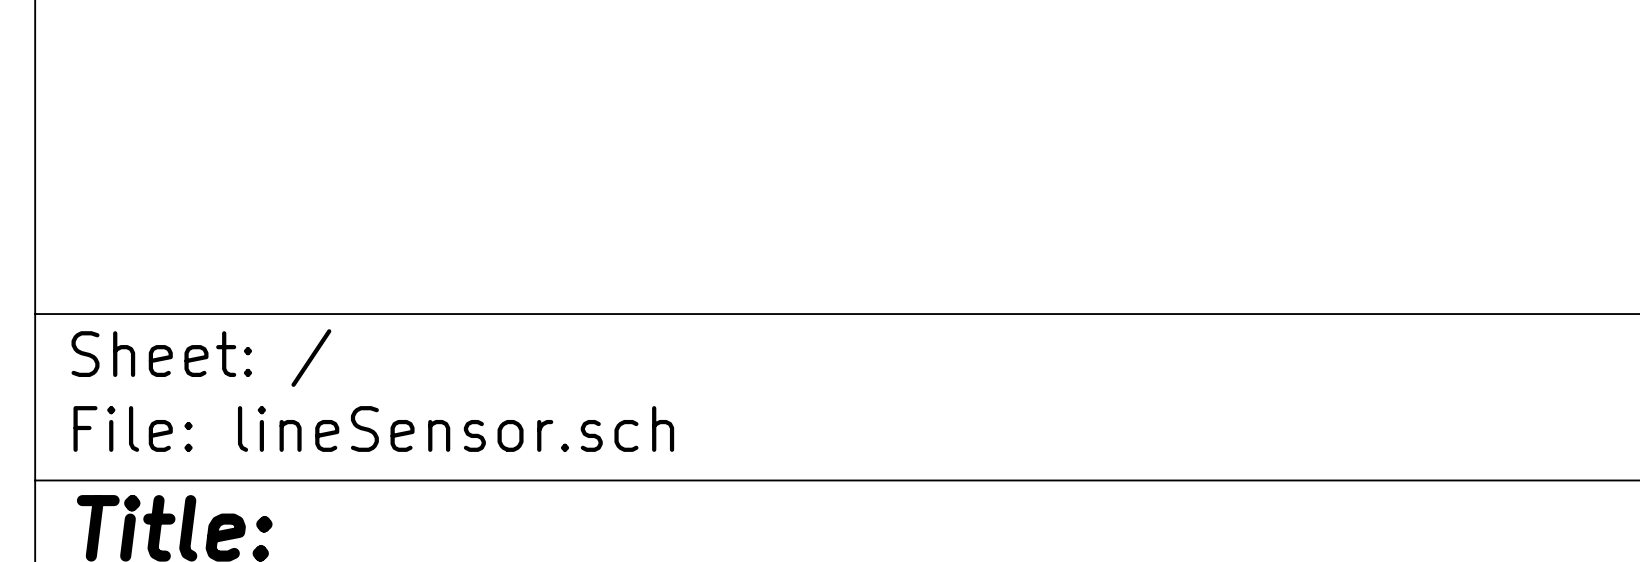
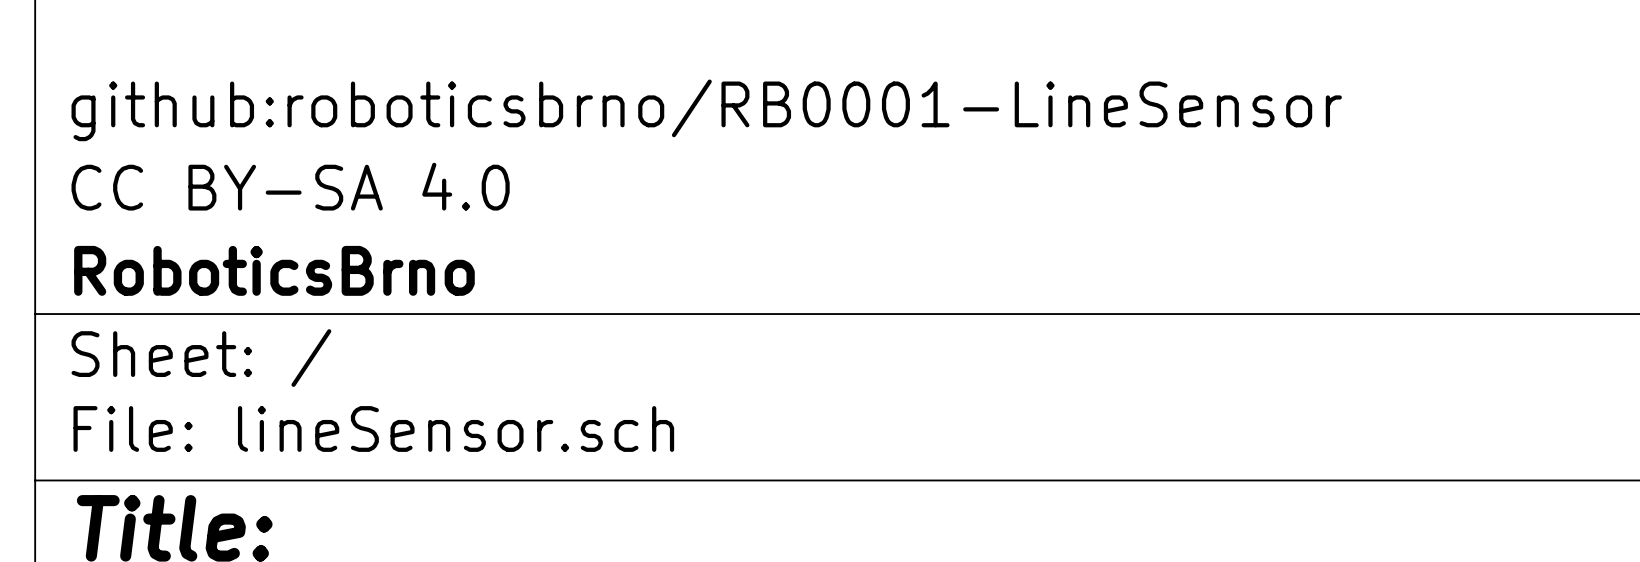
title block: none -> github:roboticsbrno/RB0001-LineSensor (706, 110)
title block: none -> CC BY-SA 4.0 (290, 186)
title block: none -> RoboticsBrno (274, 270)

